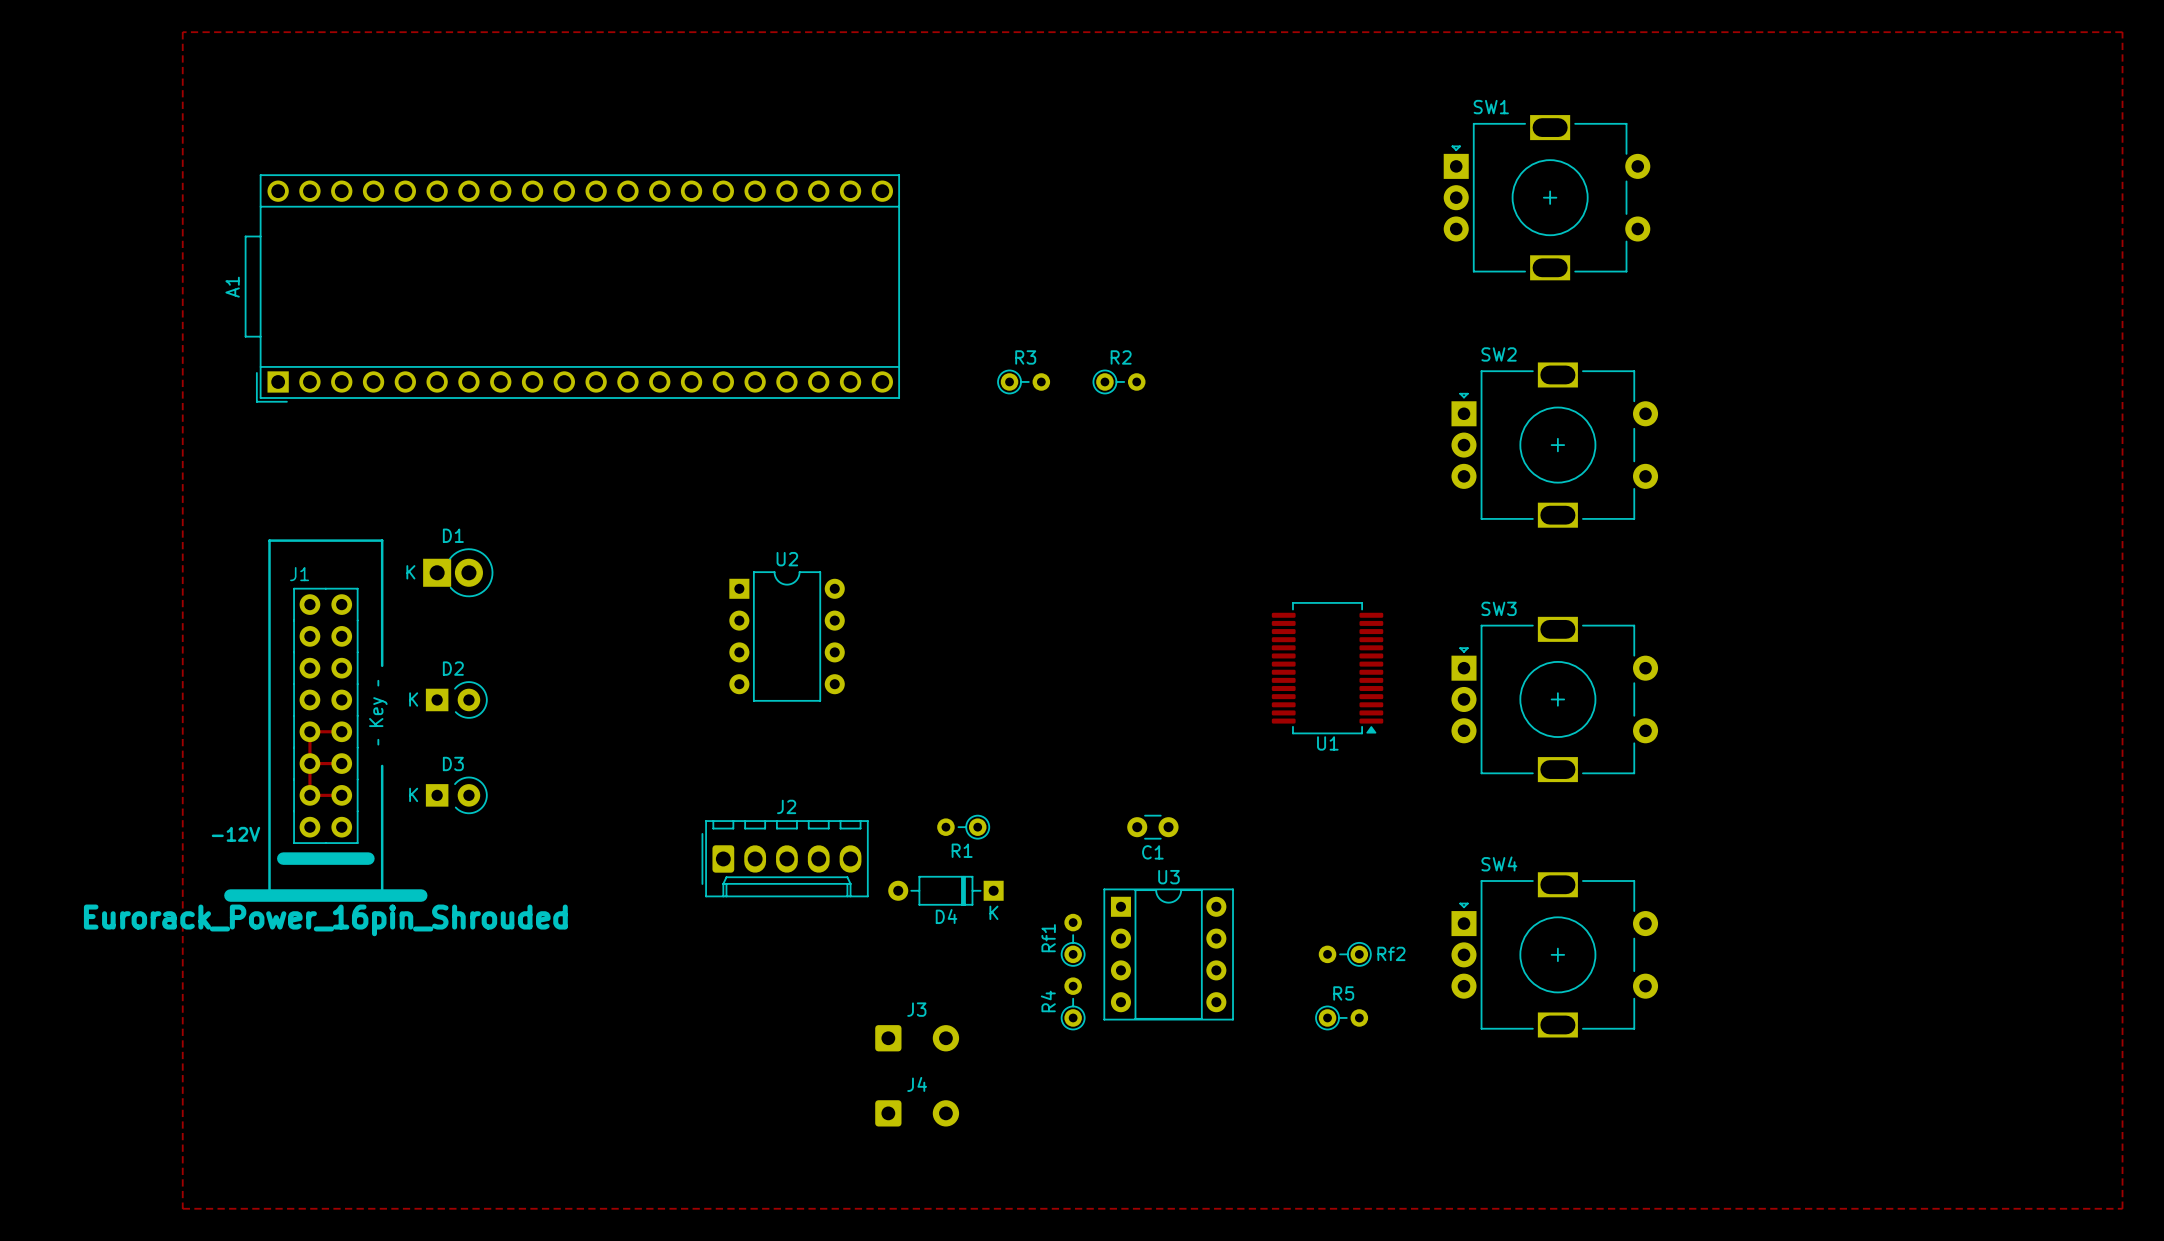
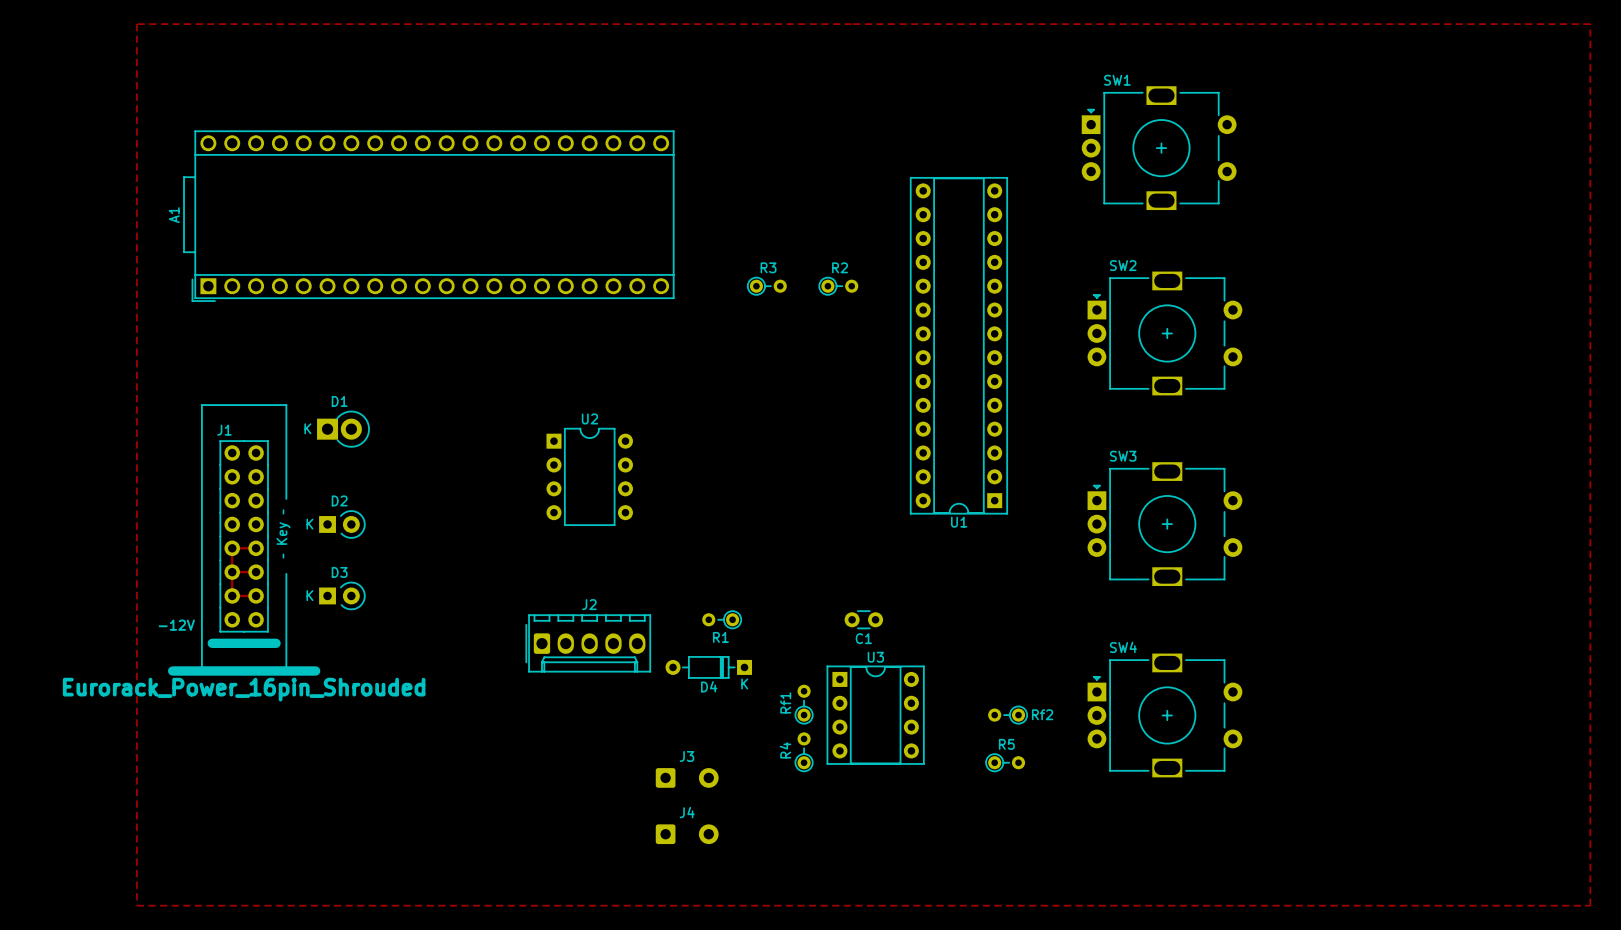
U1 footprint: [1271, 602, 1384, 735] -> [910, 177, 1008, 515]
U1 name position: U1 (1327, 743) -> U1 (959, 522)

